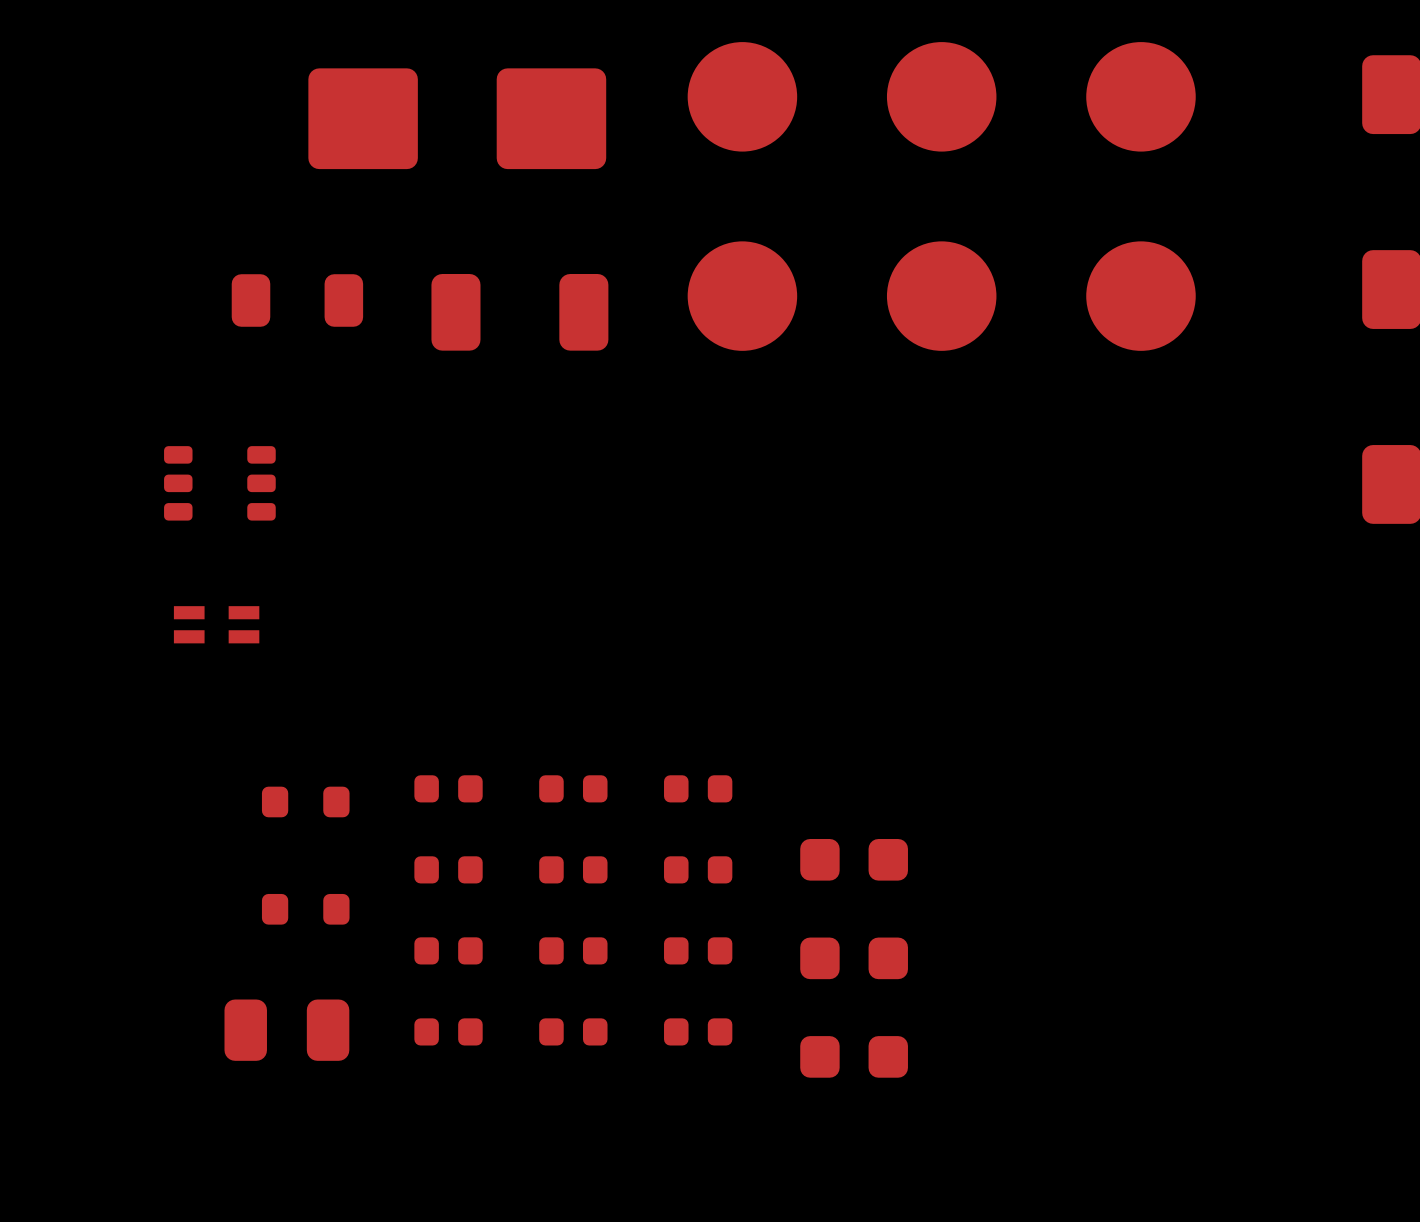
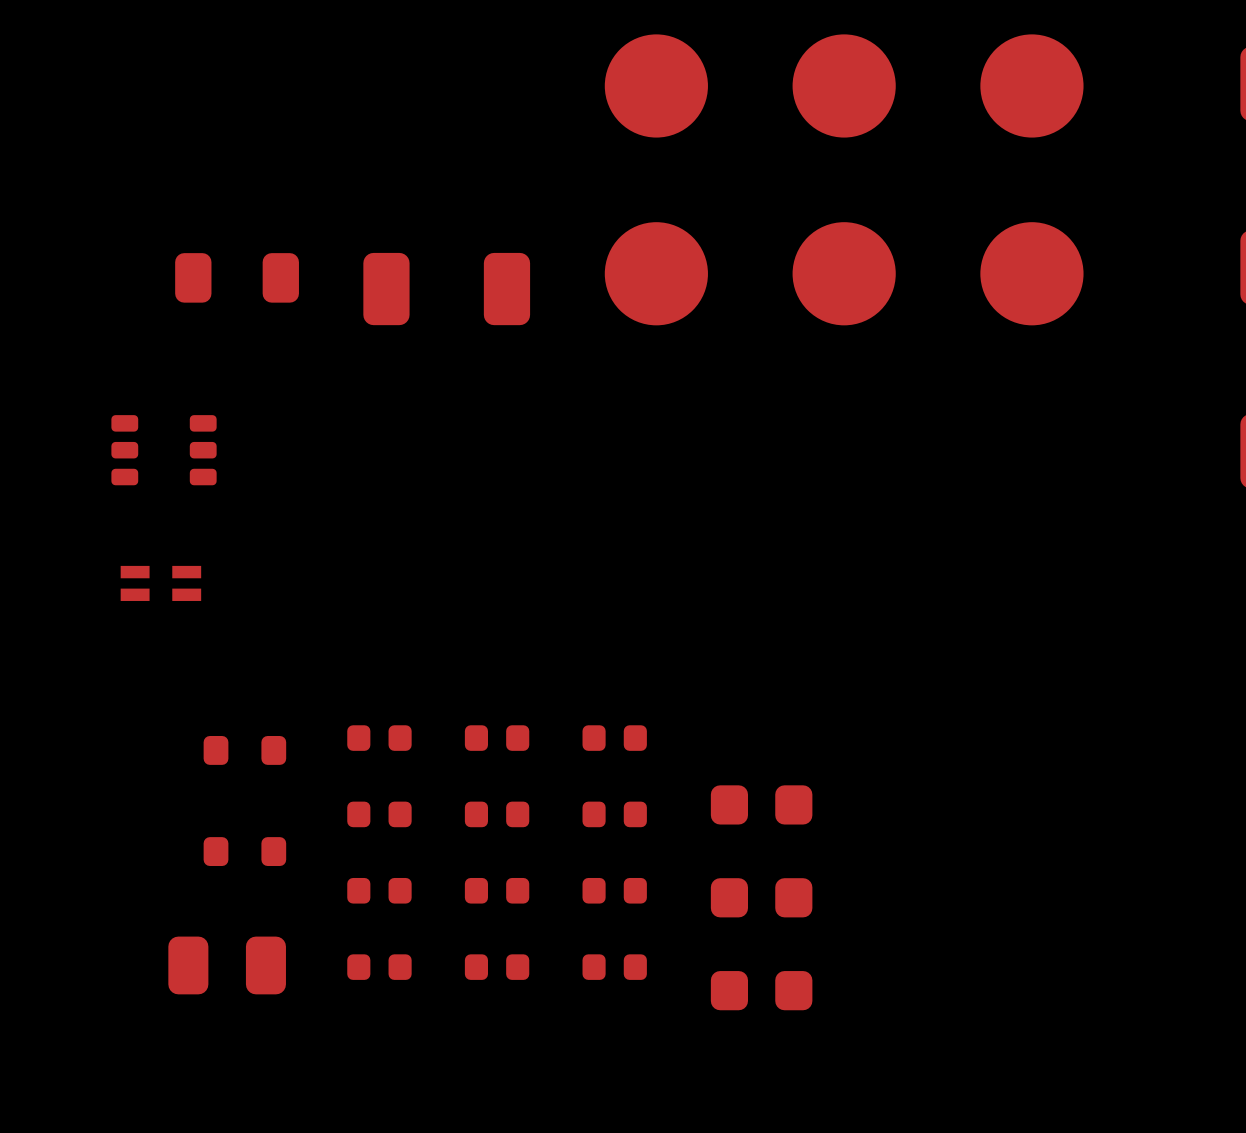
part: (457, 118) -> none

